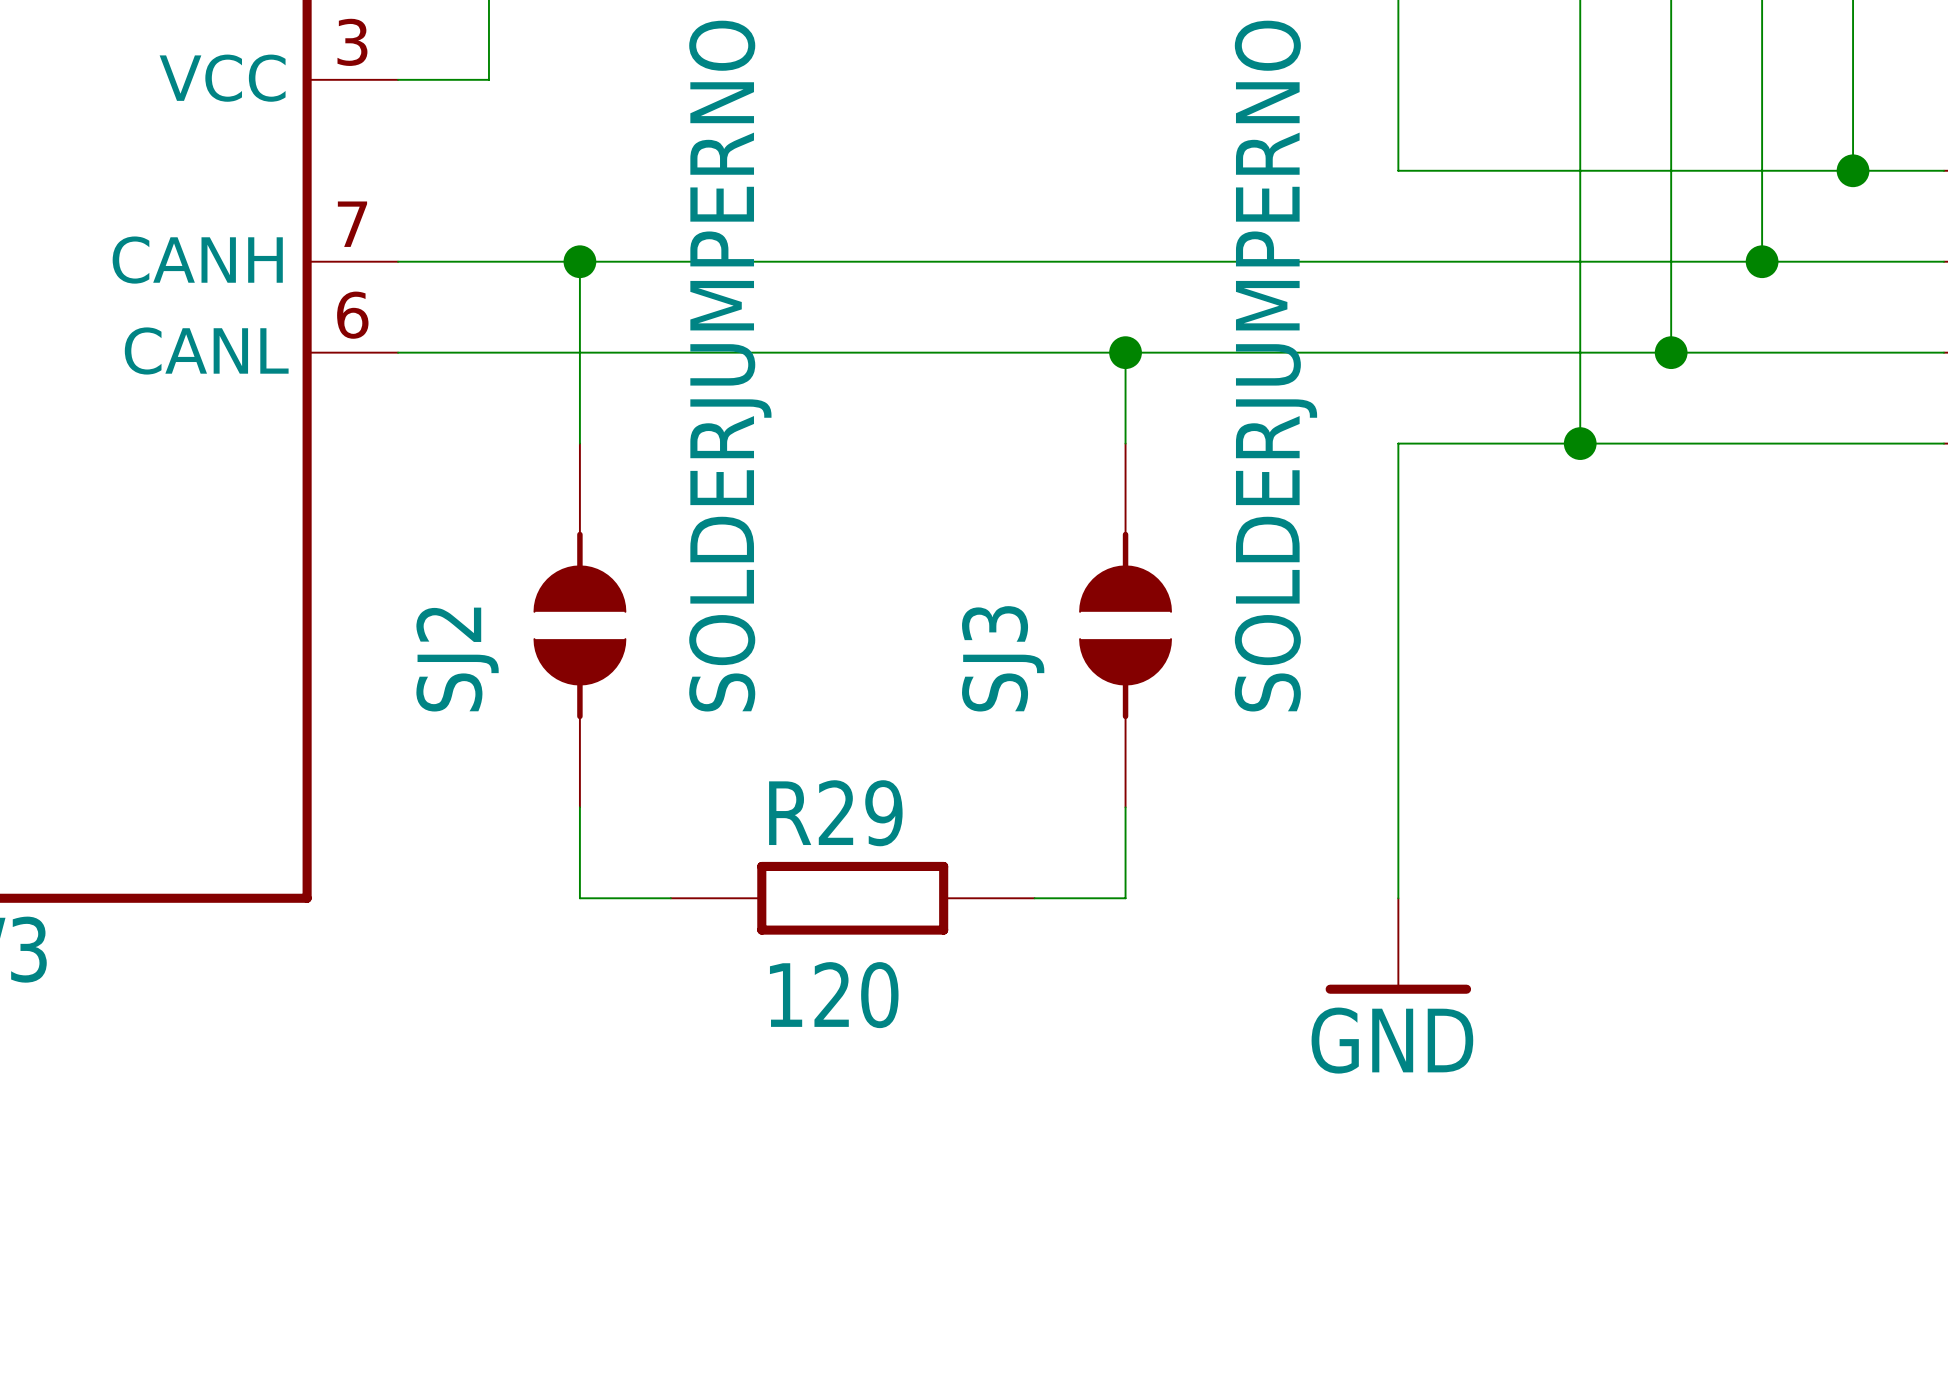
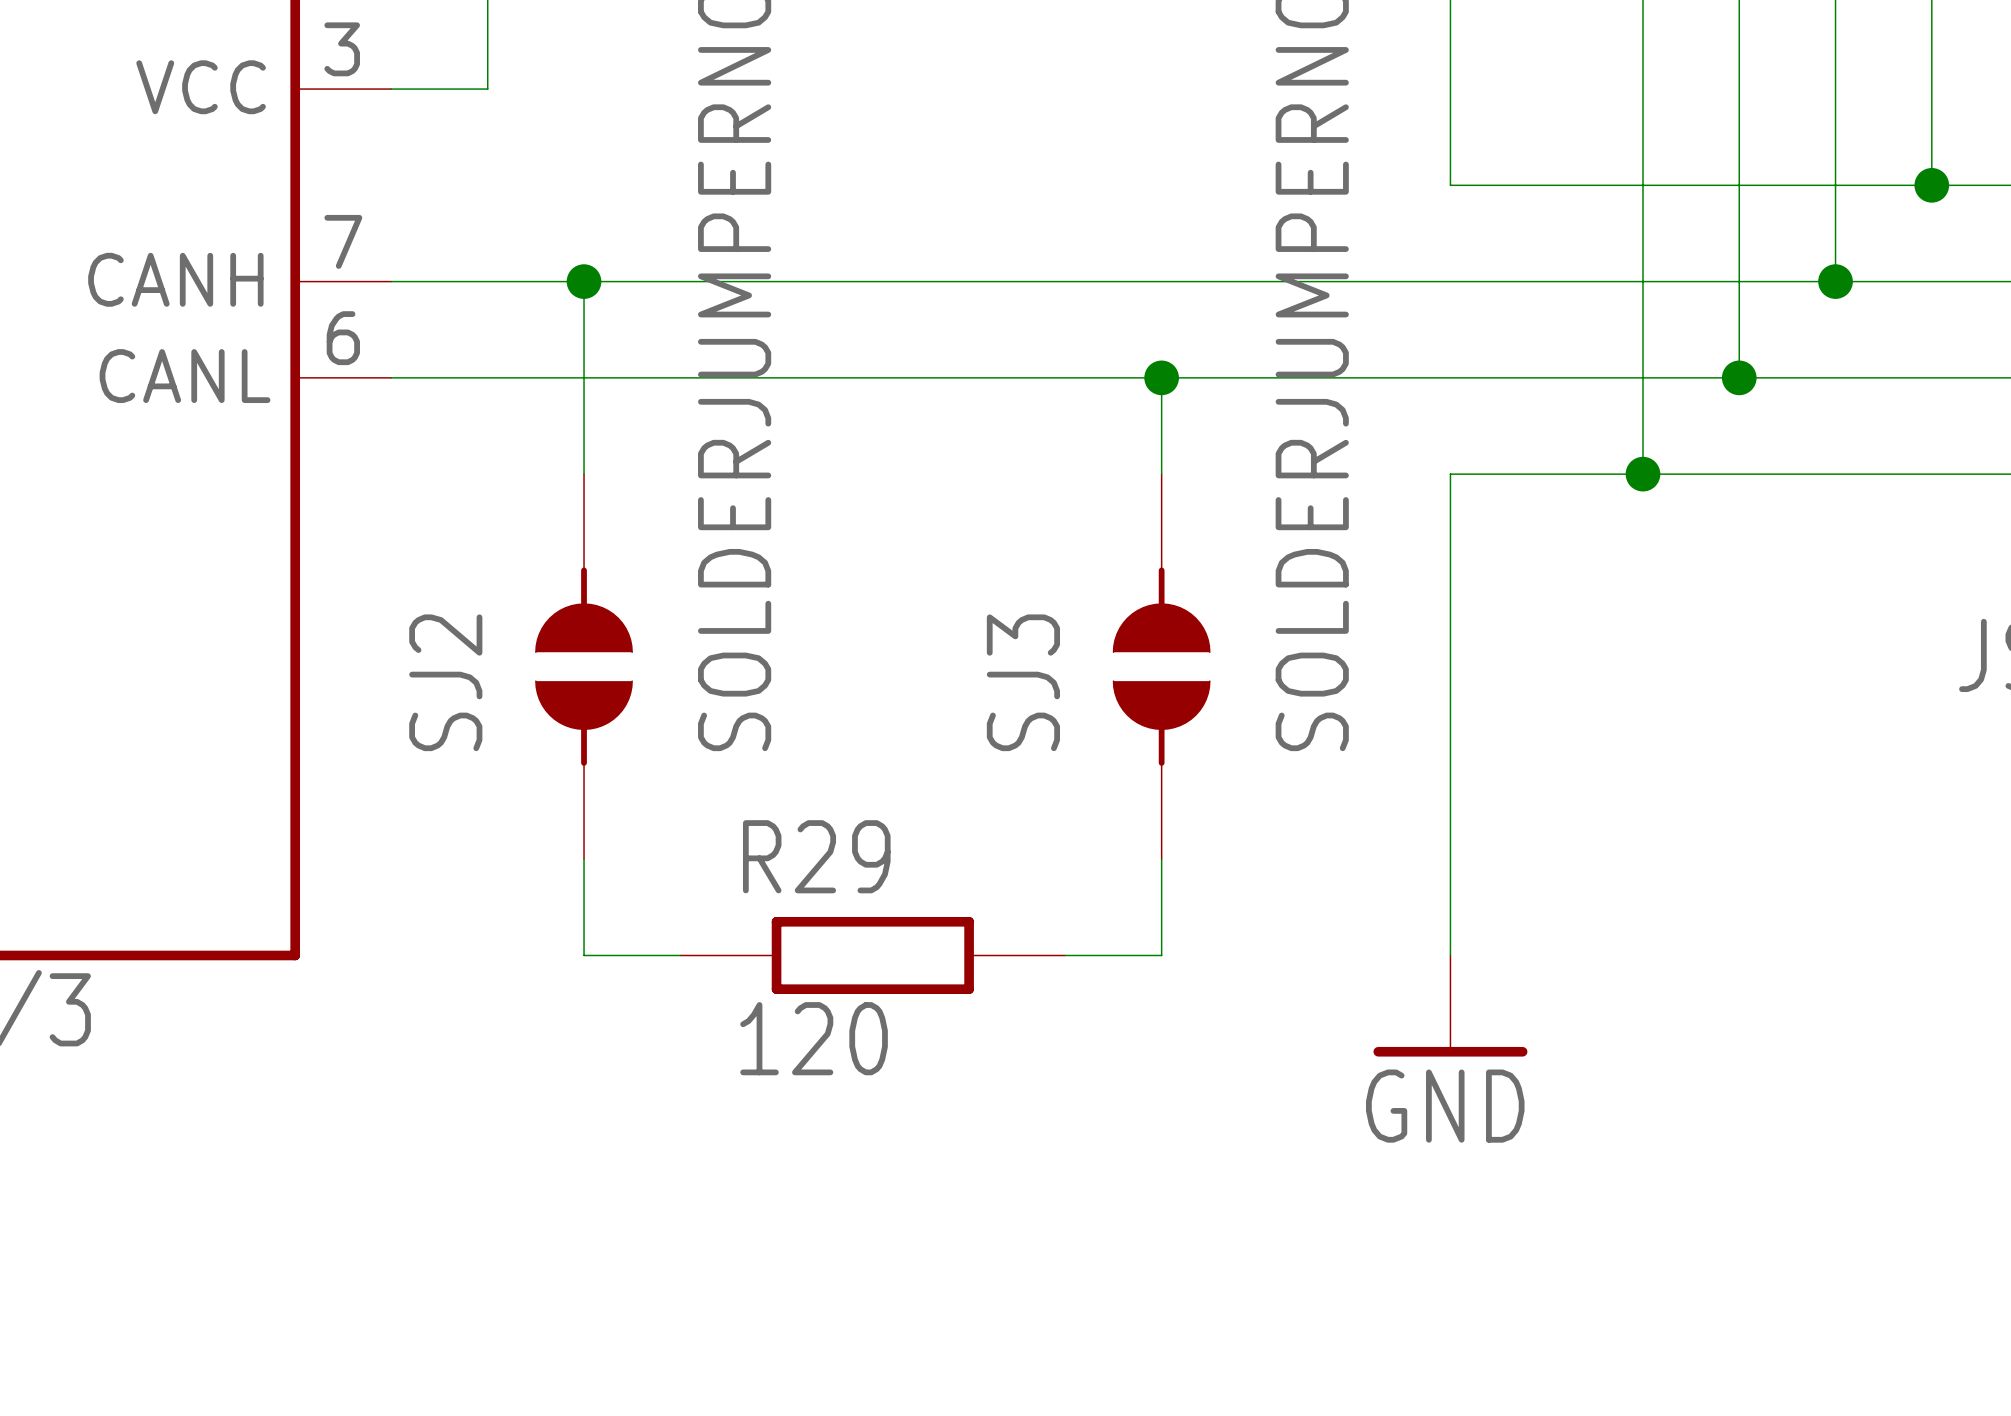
R29 name position: R29 (835, 813) -> R29 (816, 856)
R29 value position: 120 (834, 995) -> 120 (814, 1038)

